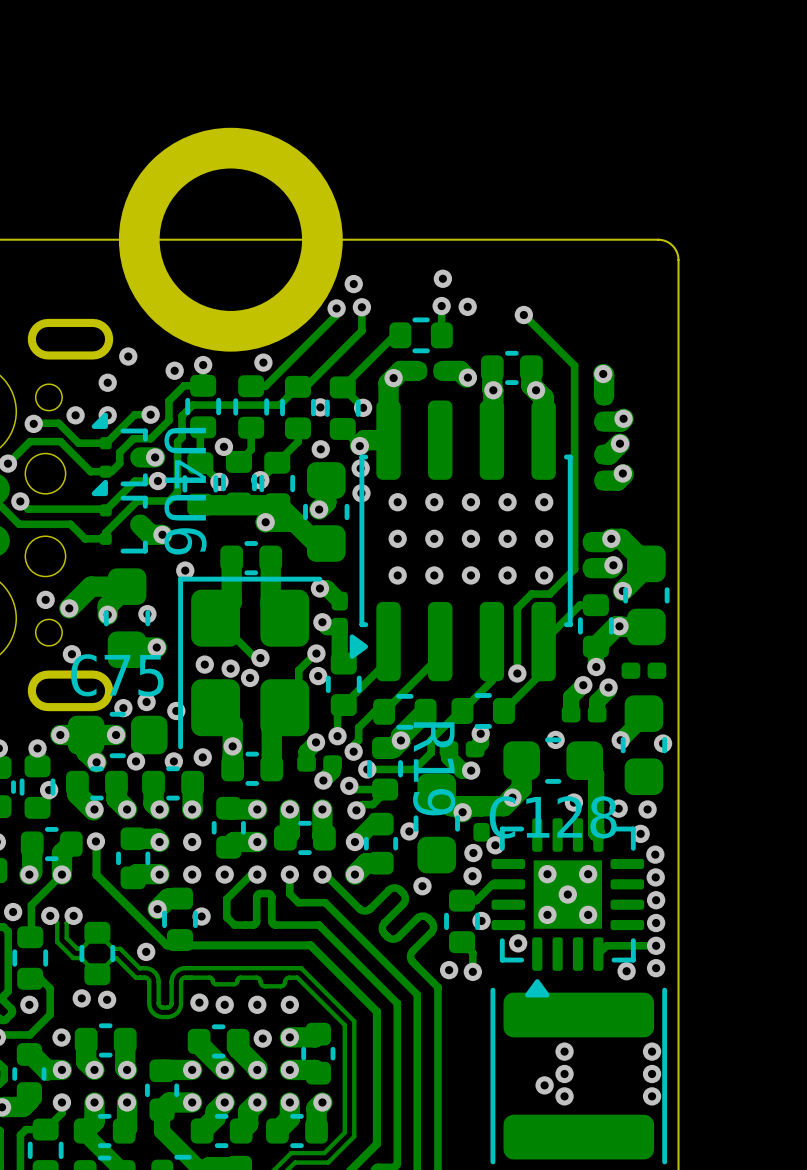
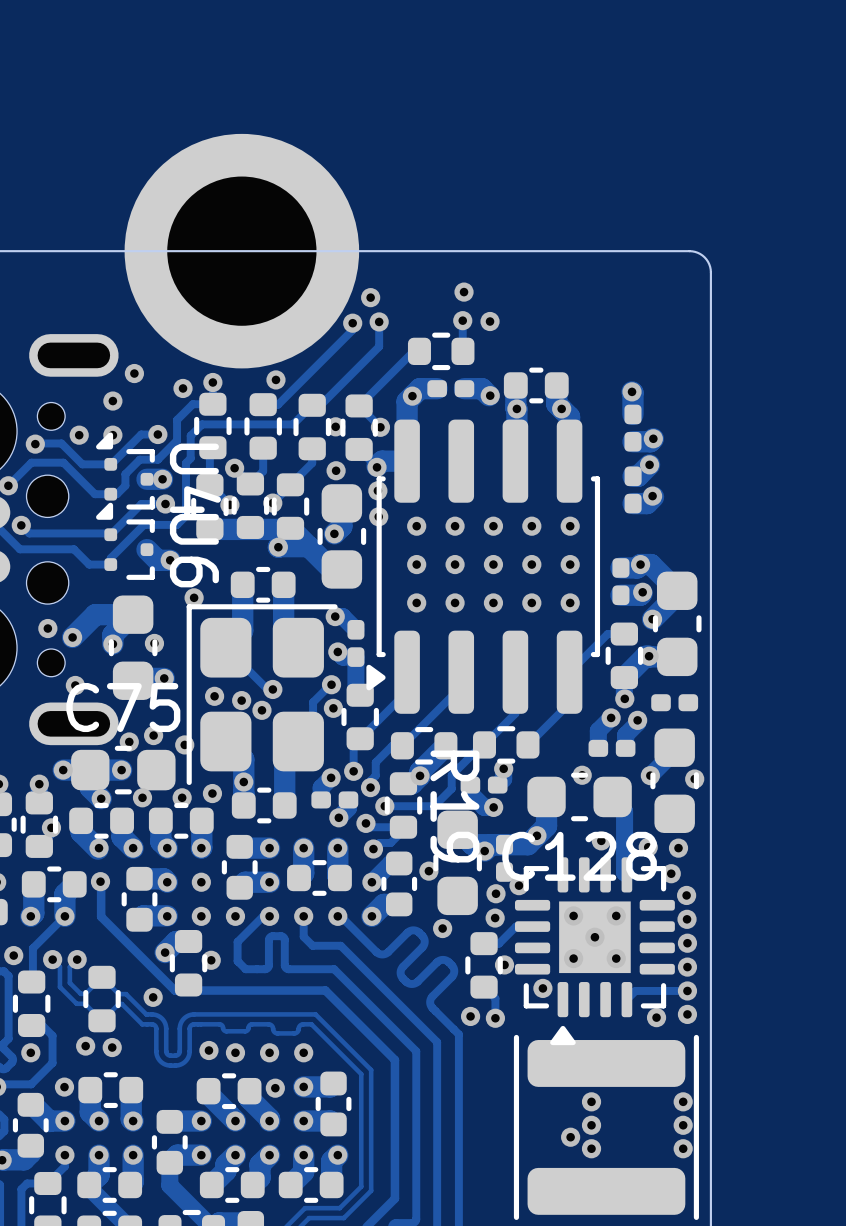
track: (523, 315) (574, 365) (574, 569) (549, 594) (531, 594) (517, 608) (517, 673) -> none
via: (523, 315) -> none
via: (517, 673) -> none

